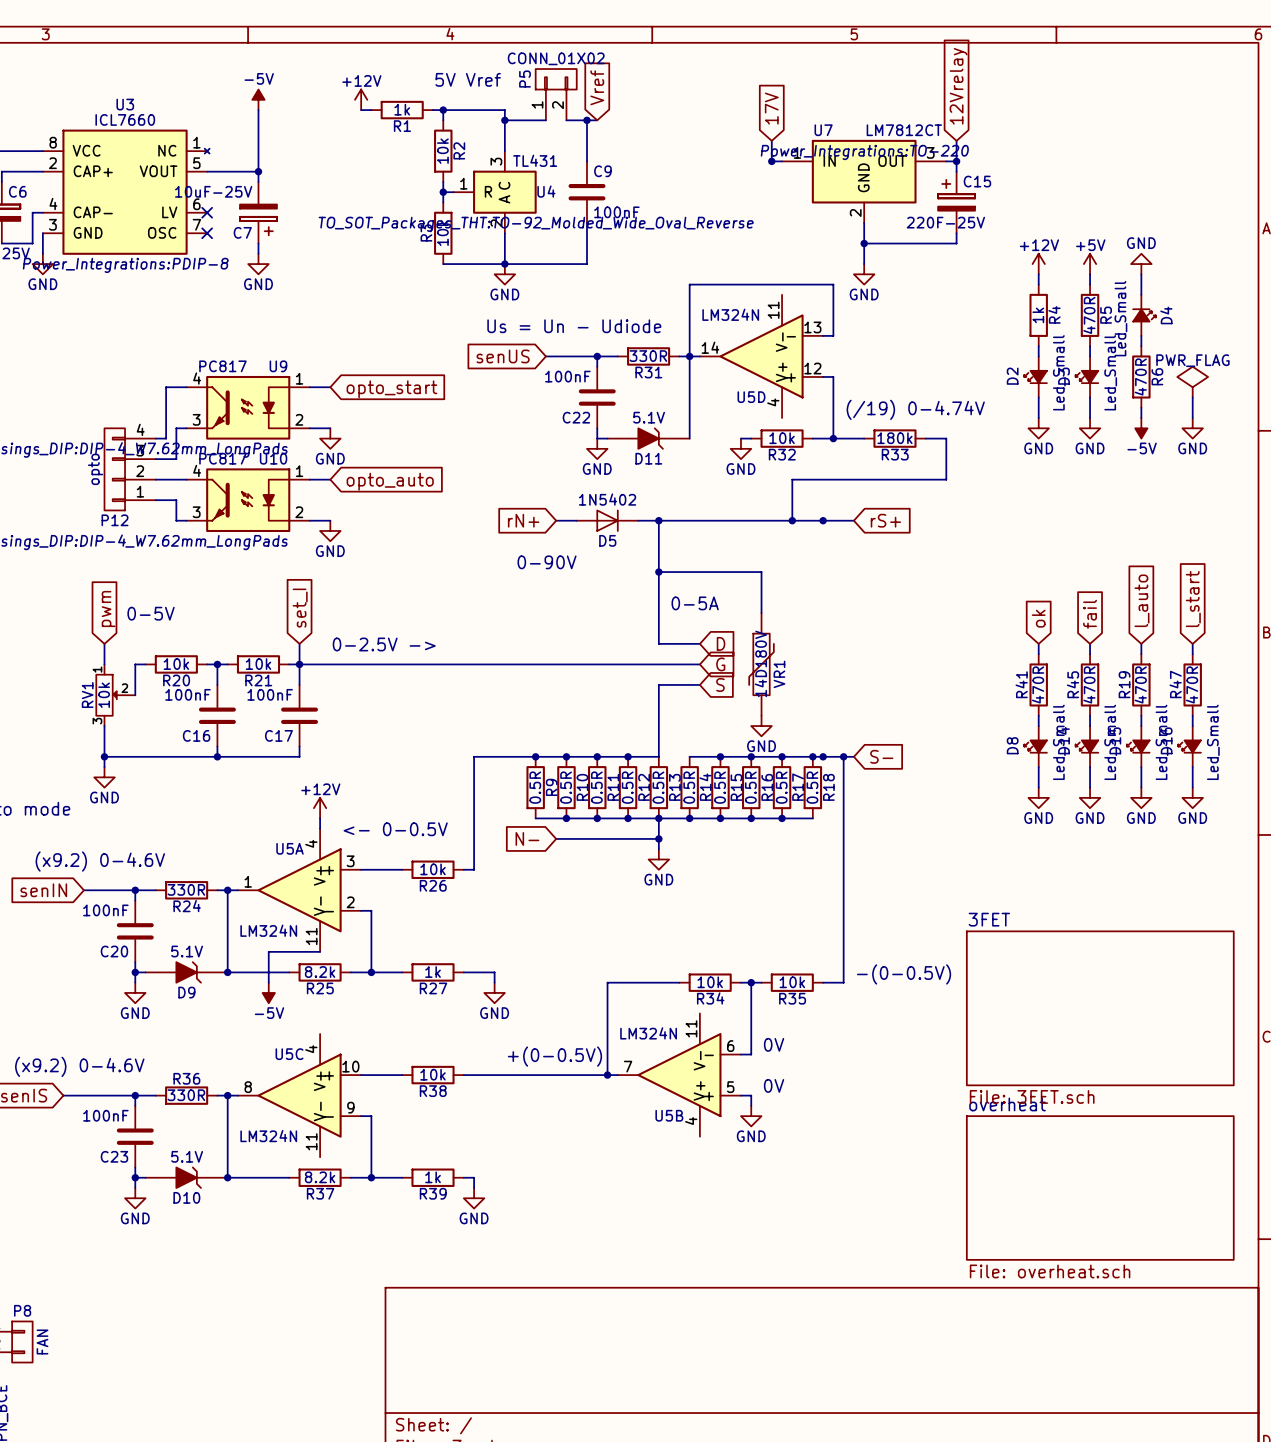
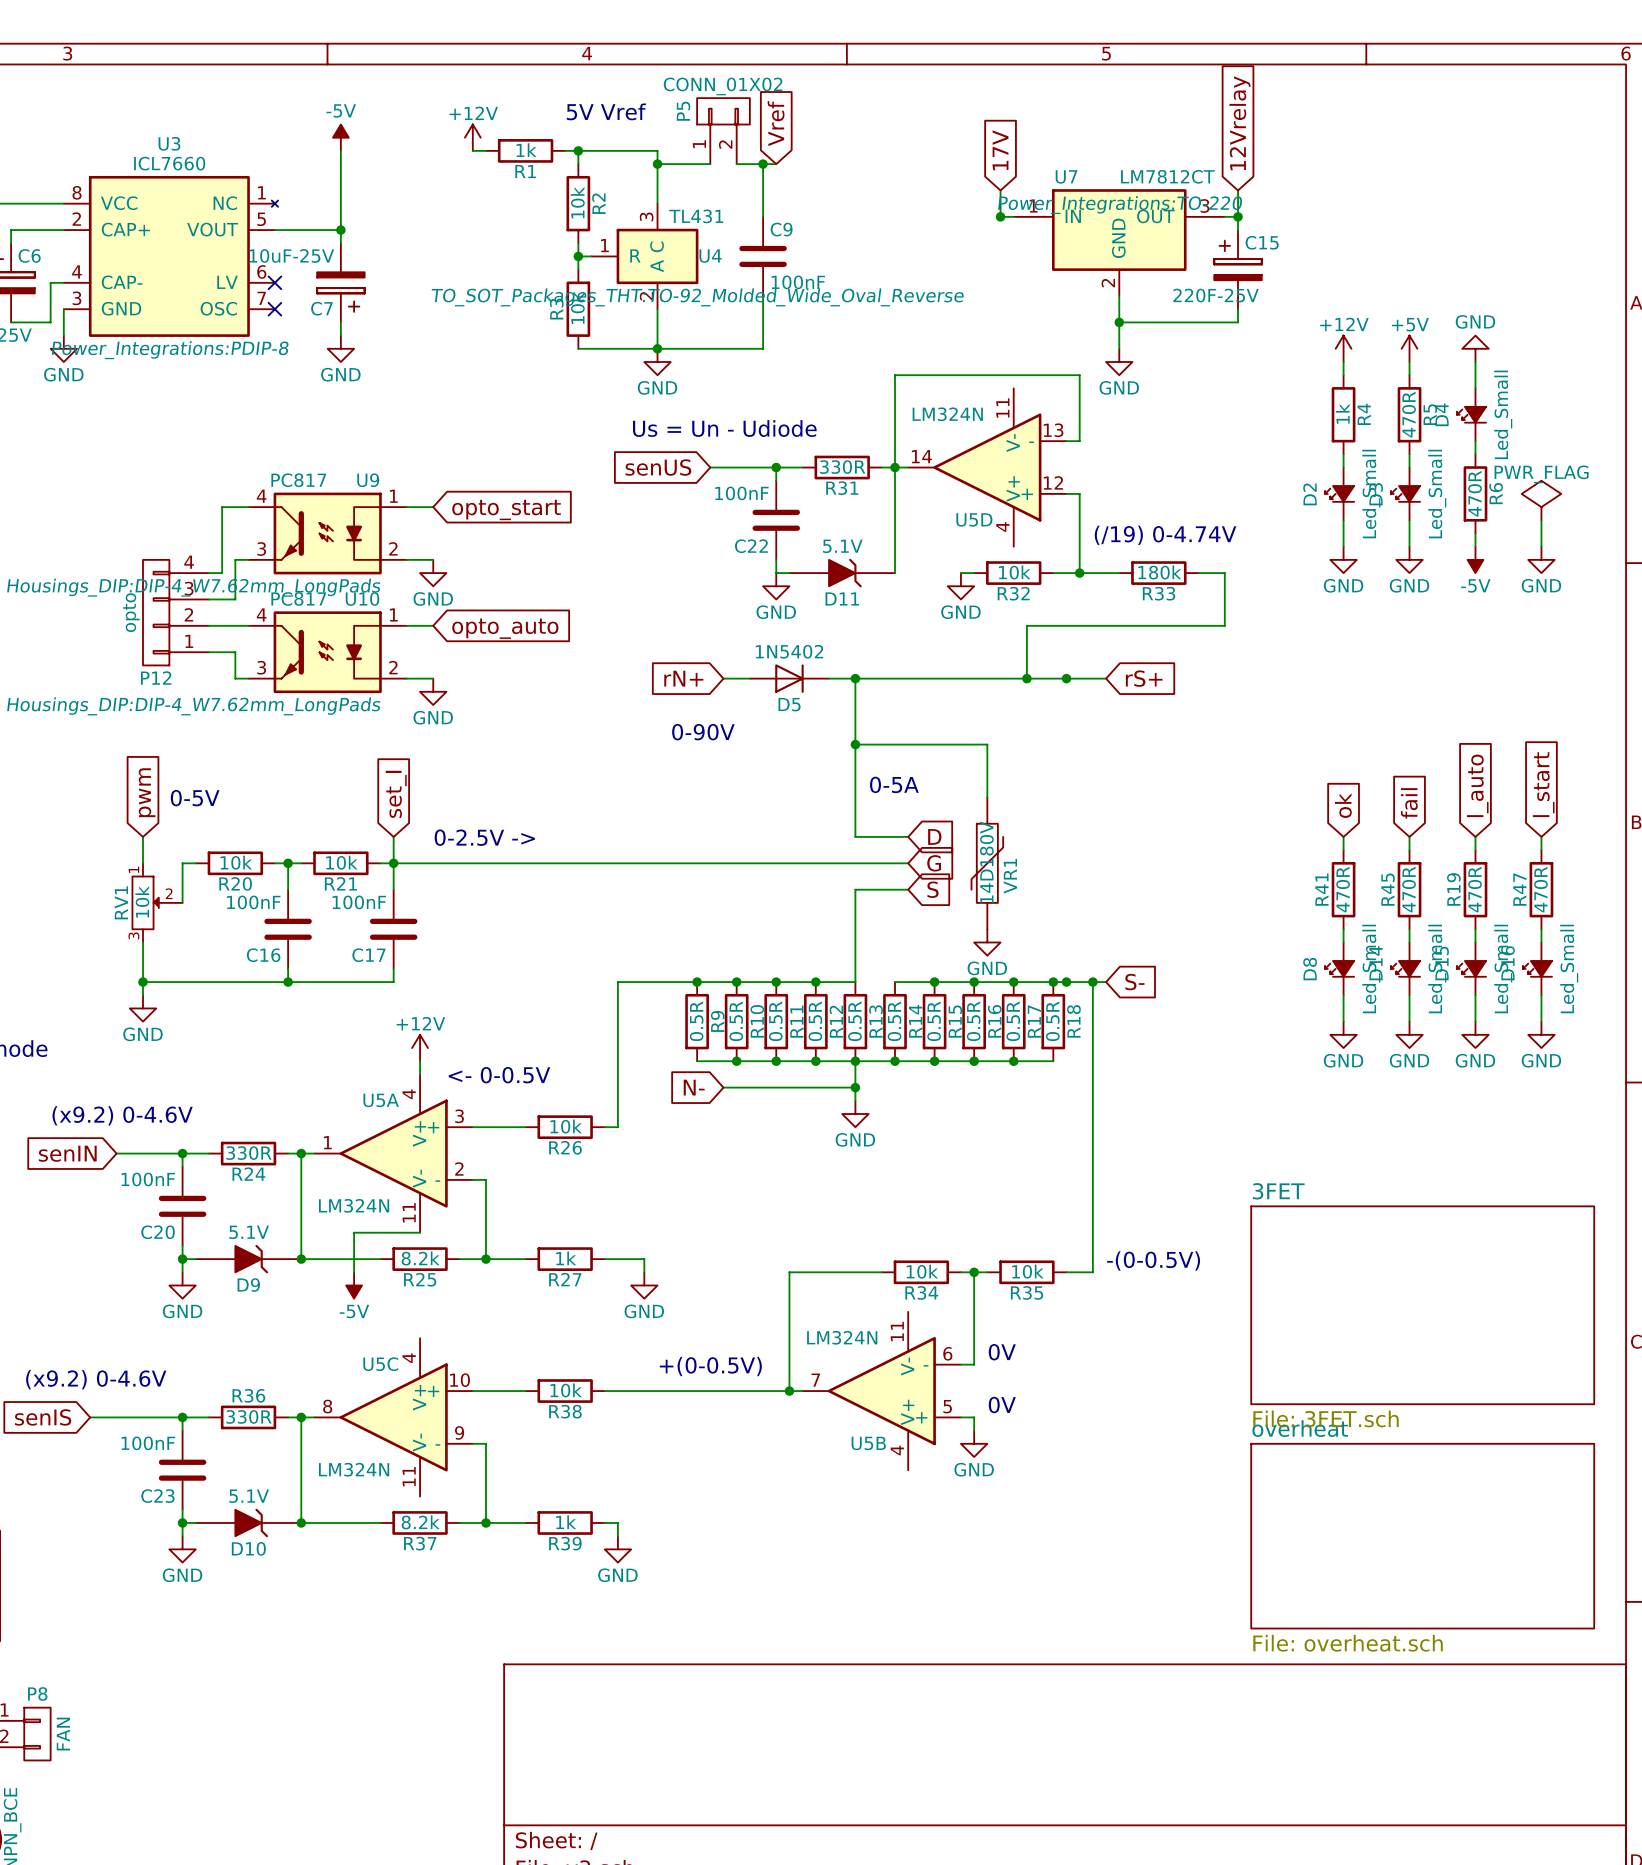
D4 rotation: 0° (1144, 315) -> 180° (1471, 414)

